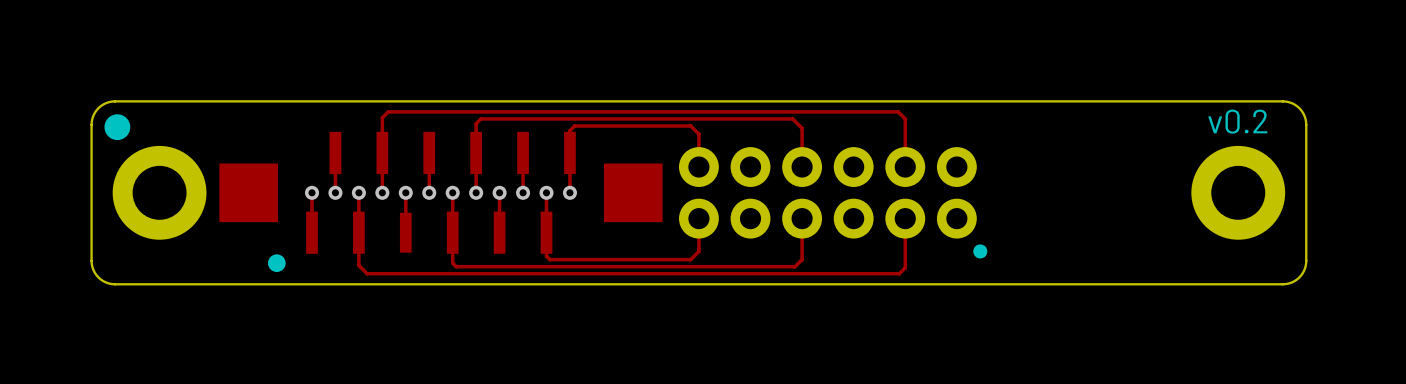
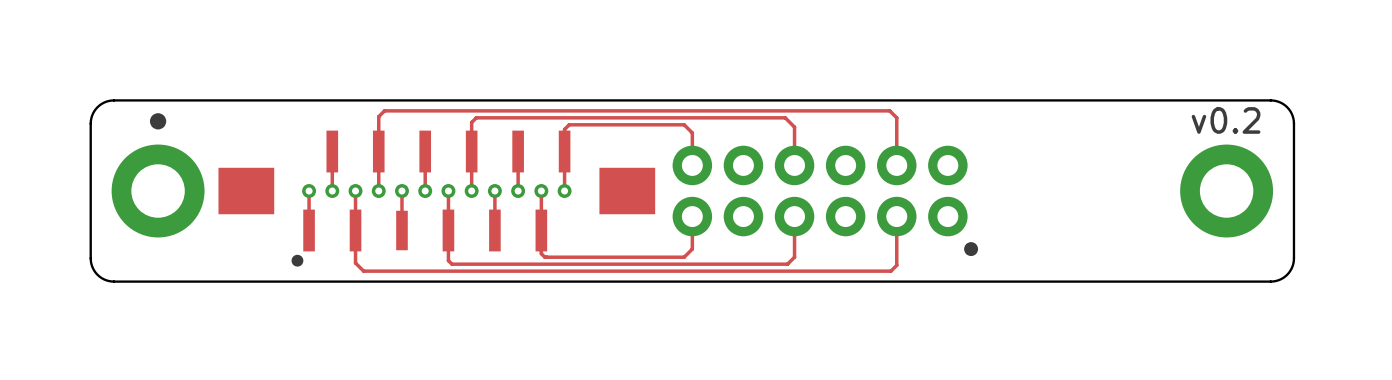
drawing: [104, 114, 131, 141] -> none
drawing: none -> [149, 113, 167, 130]
part footprint: [219, 131, 663, 273] -> [218, 130, 656, 267]

